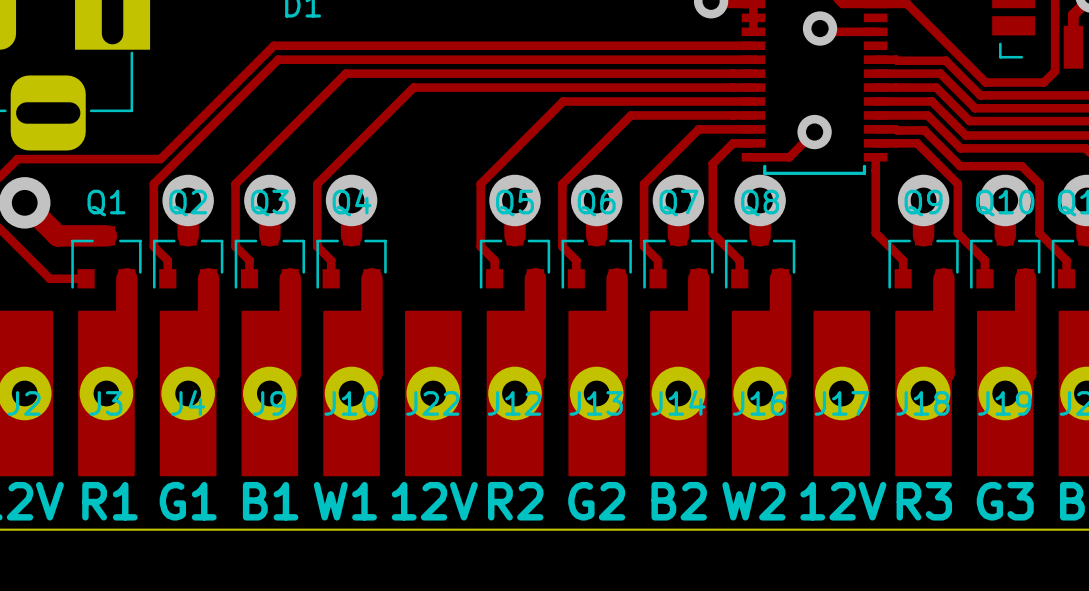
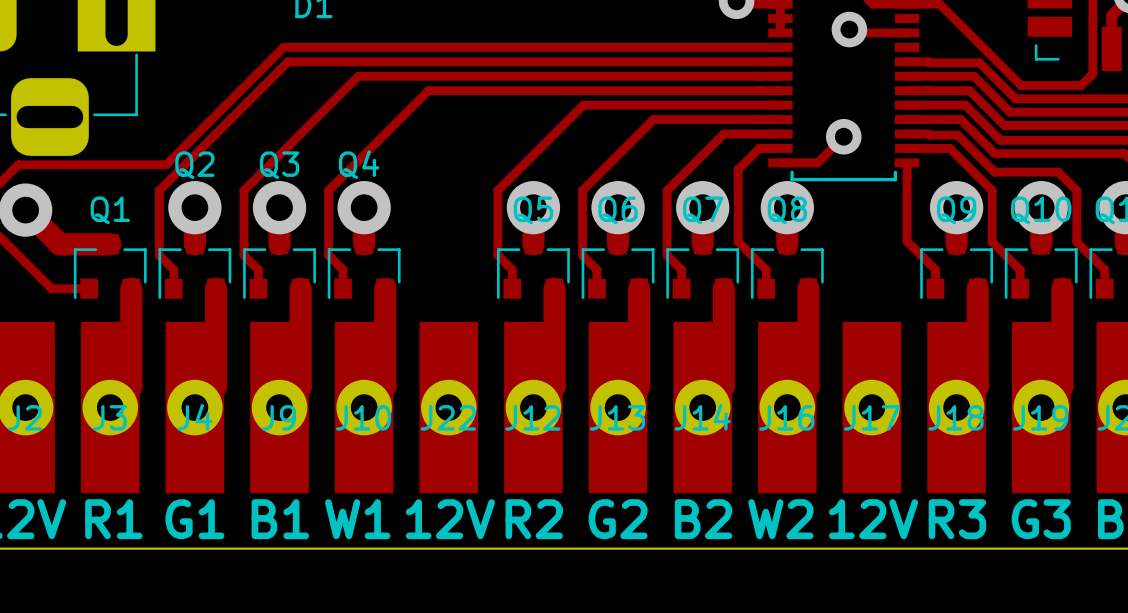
Q4 name position: Q4 (352, 202) -> Q4 (359, 164)
Q2 name position: Q2 (188, 203) -> Q2 (194, 165)
Q3 name position: Q3 (269, 203) -> Q3 (279, 165)

